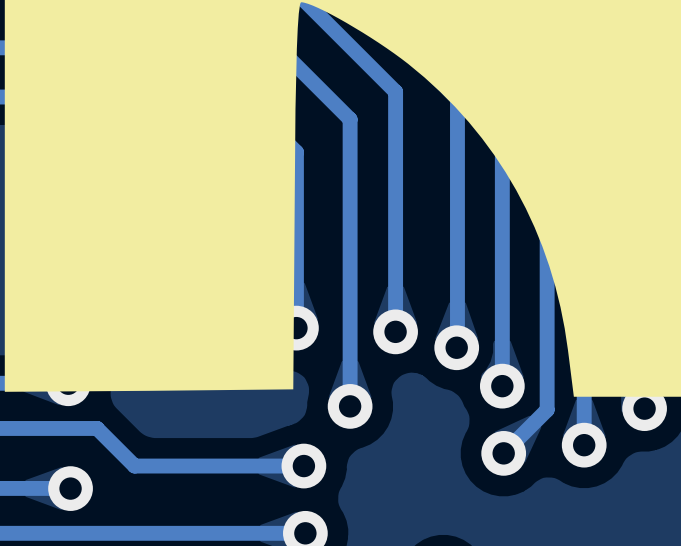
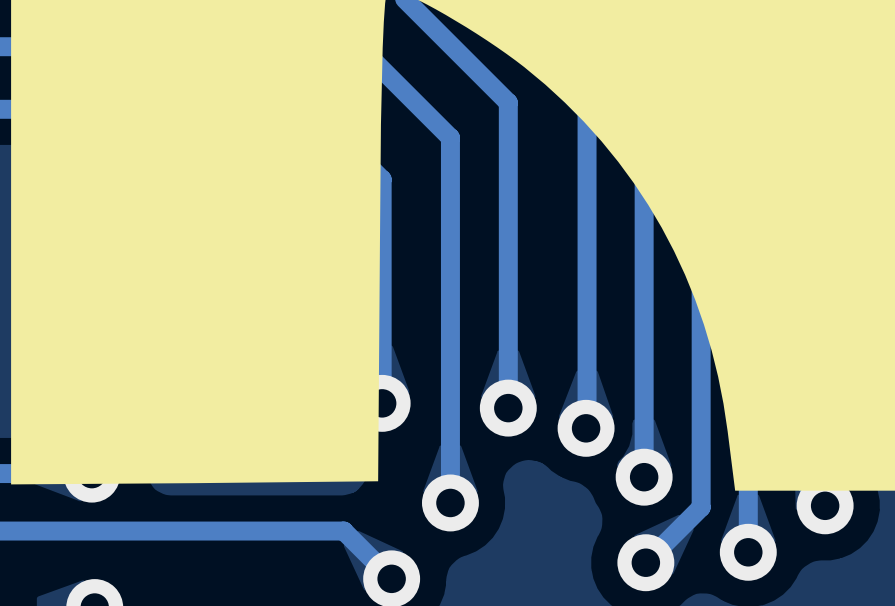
track: (97, 428) (134, 466) (303, 466) -> (128, 531) (343, 531) (391, 578)

